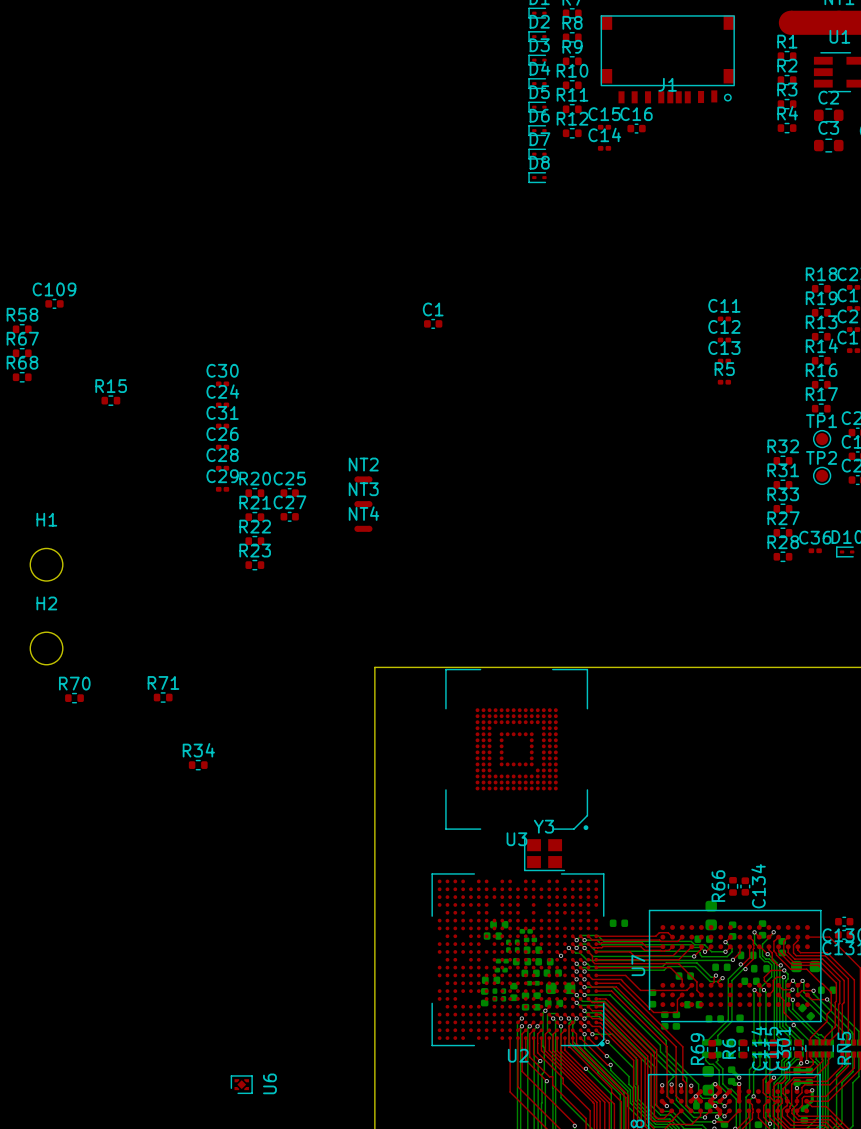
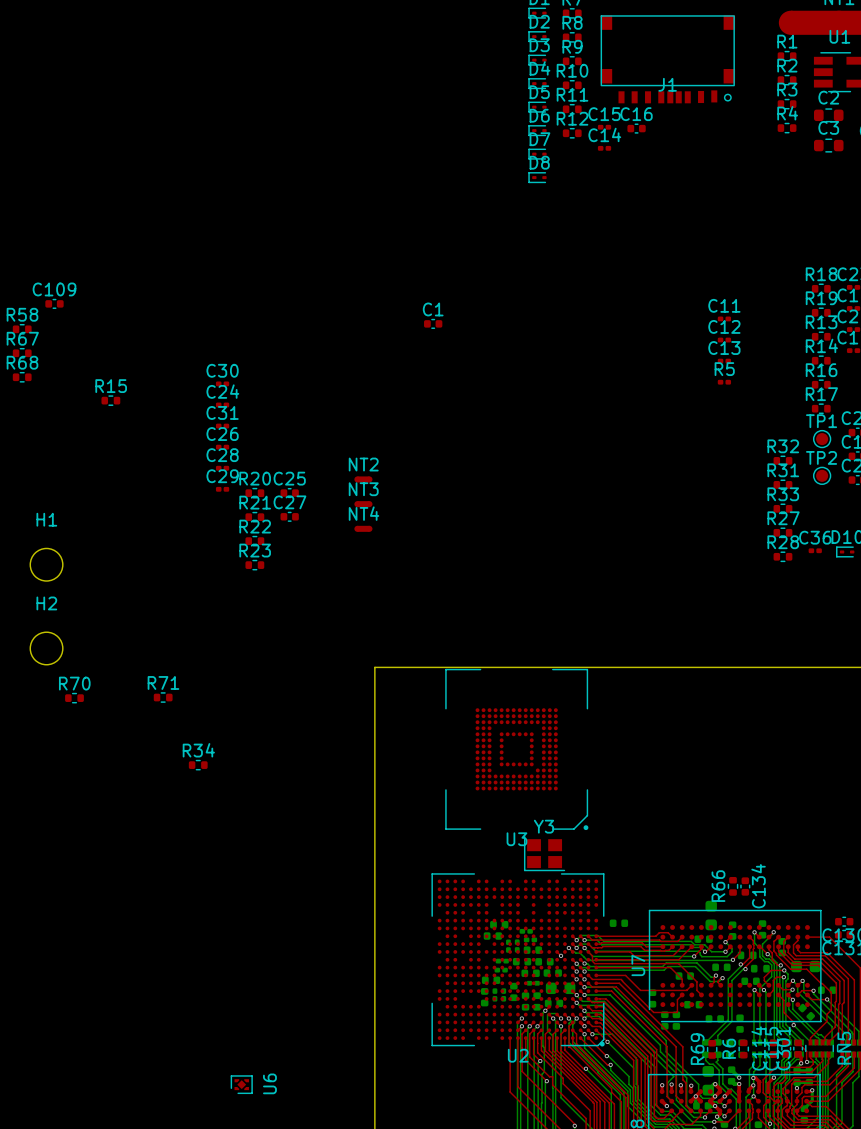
top track: none -> (753, 1078) (759, 1082) (758, 1091)
via: none -> (753, 1078)
top track: none -> (753, 1085) (748, 1091)
via: none -> (753, 1085)

